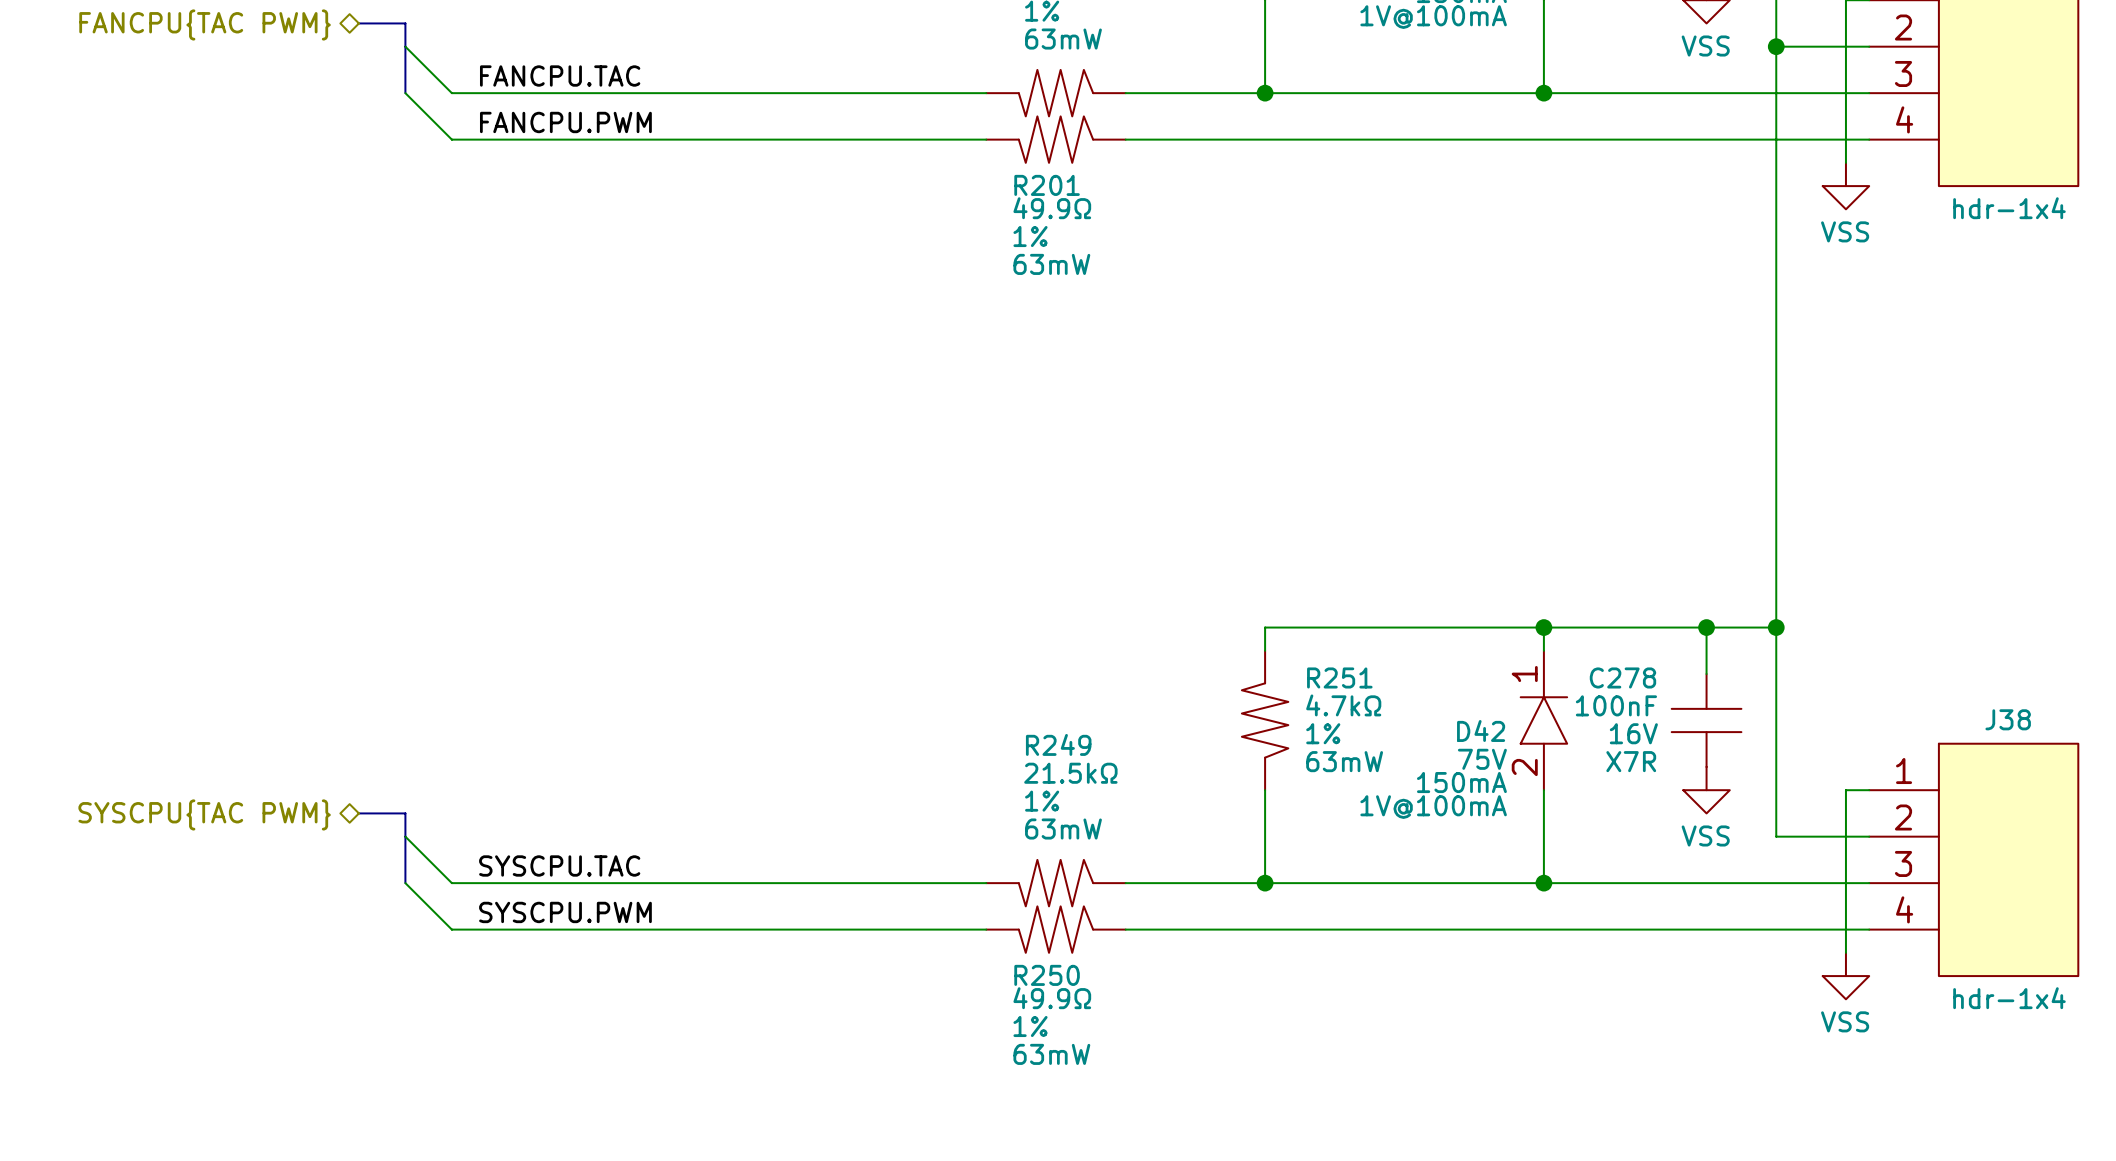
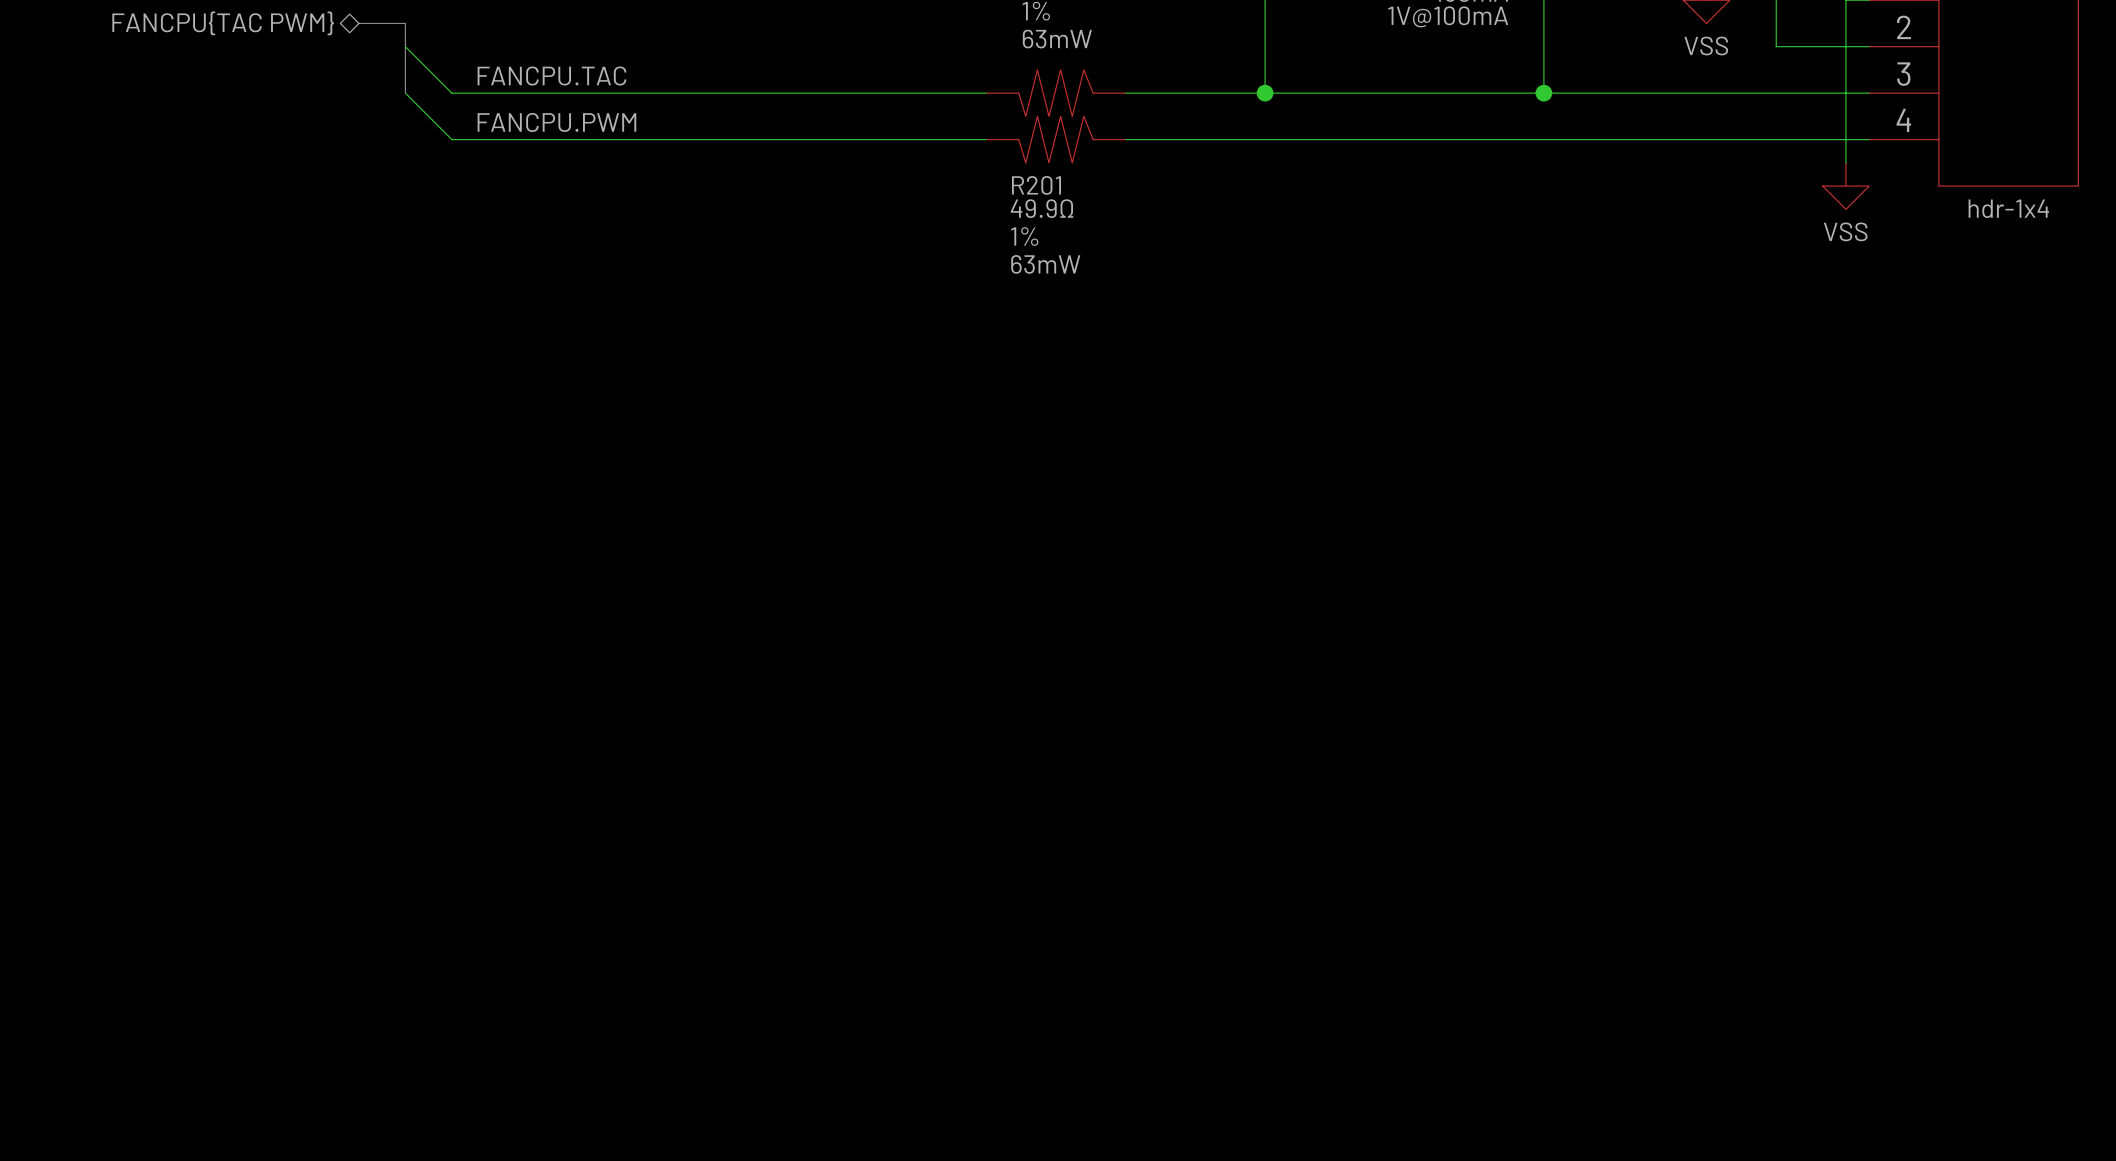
wire: (1776, 46) (1776, 836) (1869, 836) -> none
junction: (1776, 46) -> none
wire: (1543, 627) (1543, 650) -> none
junction: (1543, 627) -> none
wire: (1706, 627) (1706, 674) -> none
junction: (1706, 627) -> none
wire: (1776, 627) (1265, 627) (1265, 650) -> none
junction: (1776, 627) -> none
R251: (1265, 720) -> none
D42: (1543, 720) -> none
C278: (1706, 720) -> none
wire: (1265, 790) (1265, 883) -> none
wire: (1543, 790) (1543, 883) -> none
power symbol: VSS (1706, 790) -> none
wire: (1869, 790) (1845, 790) (1845, 952) -> none
bus: (358, 813) (405, 813) (405, 883) -> none
hierarchical label: SYSCPU{TAC PWM} (204, 814) -> none
wire: (405, 836) (451, 883) (986, 883) -> none
J38: hdr-1x4 (1973, 859) -> none
label: SYSCPU.TAC (559, 865) -> none
wire: (405, 883) (451, 929) (986, 929) -> none
R249: (1055, 883) -> none
wire: (1125, 883) (1869, 883) -> none
junction: (1265, 883) -> none
junction: (1543, 883) -> none
label: SYSCPU.PWM (565, 912) -> none
R250: (1055, 929) -> none
wire: (1125, 929) (1869, 929) -> none
power symbol: VSS (1845, 976) -> none

